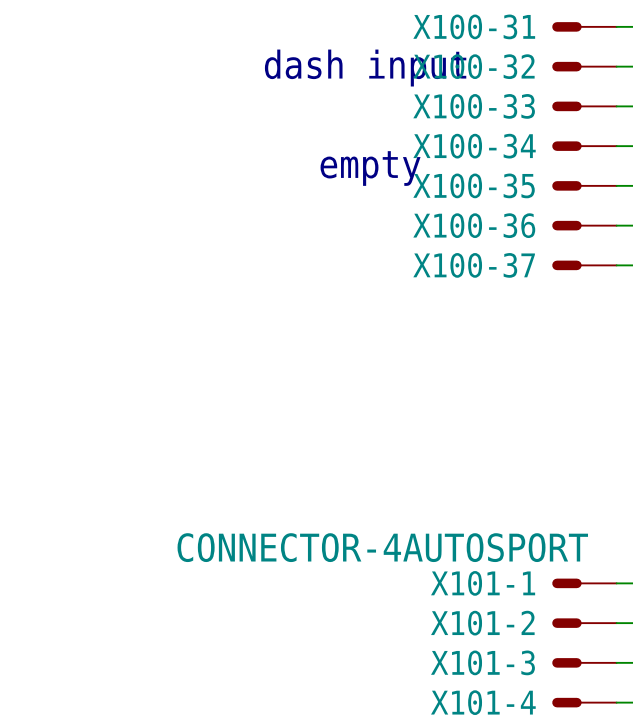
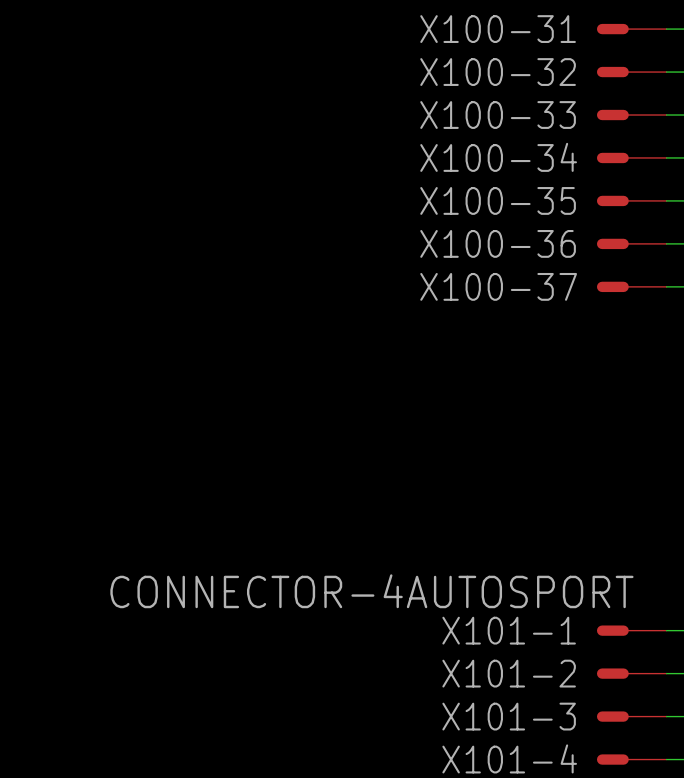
text: dash input (365, 68) -> none
text: empty (370, 168) -> none

